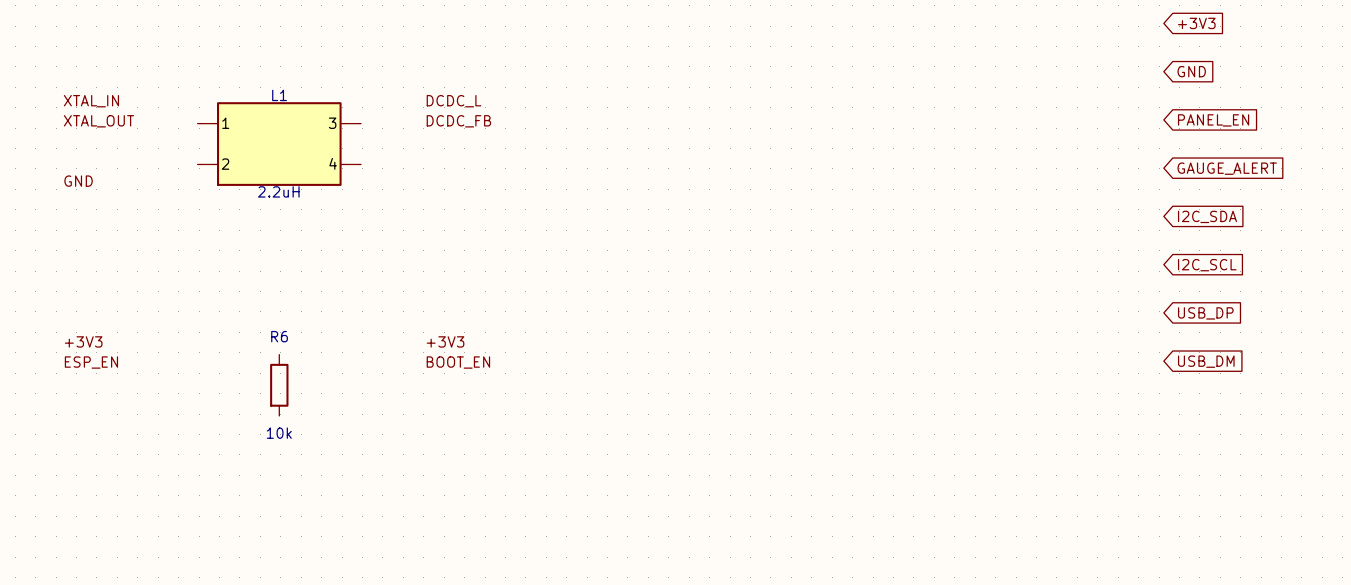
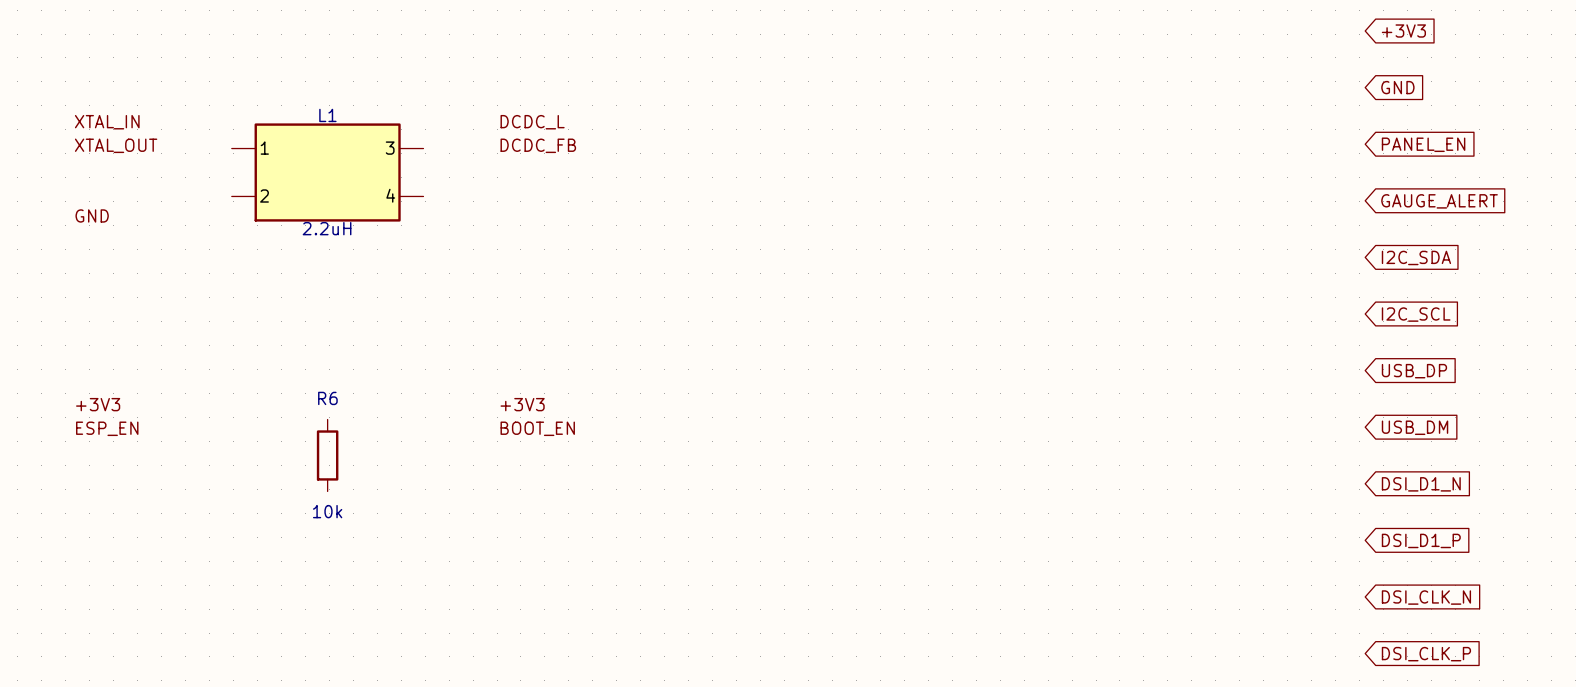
global label: none -> DSI_D1_N (1421, 484)
global label: none -> DSI_D1_P (1421, 540)
global label: none -> DSI_CLK_N (1426, 597)
global label: none -> DSI_CLK_P (1426, 654)

